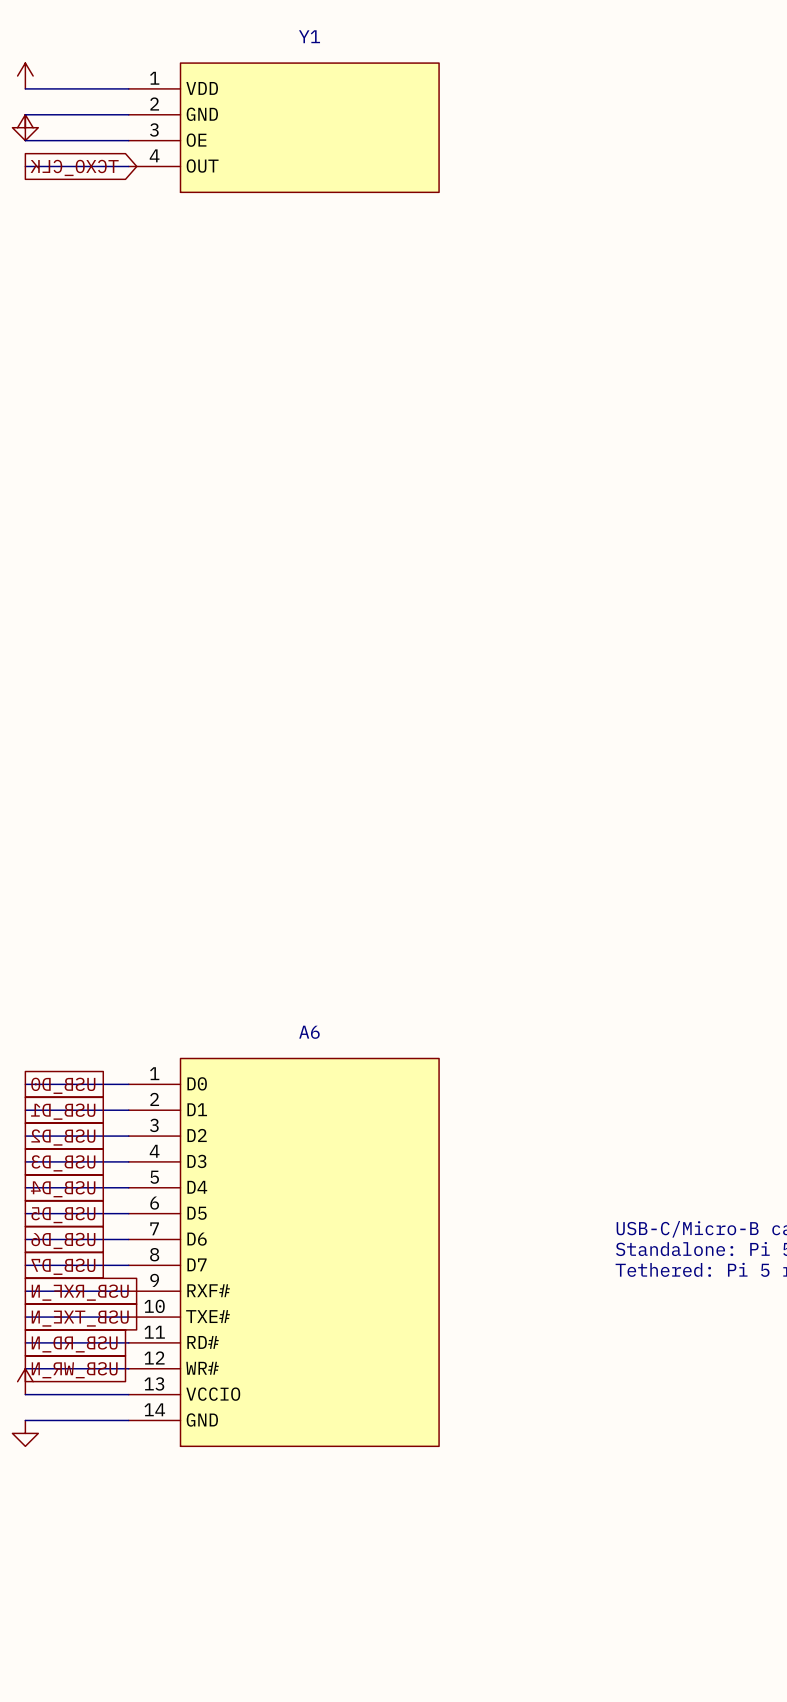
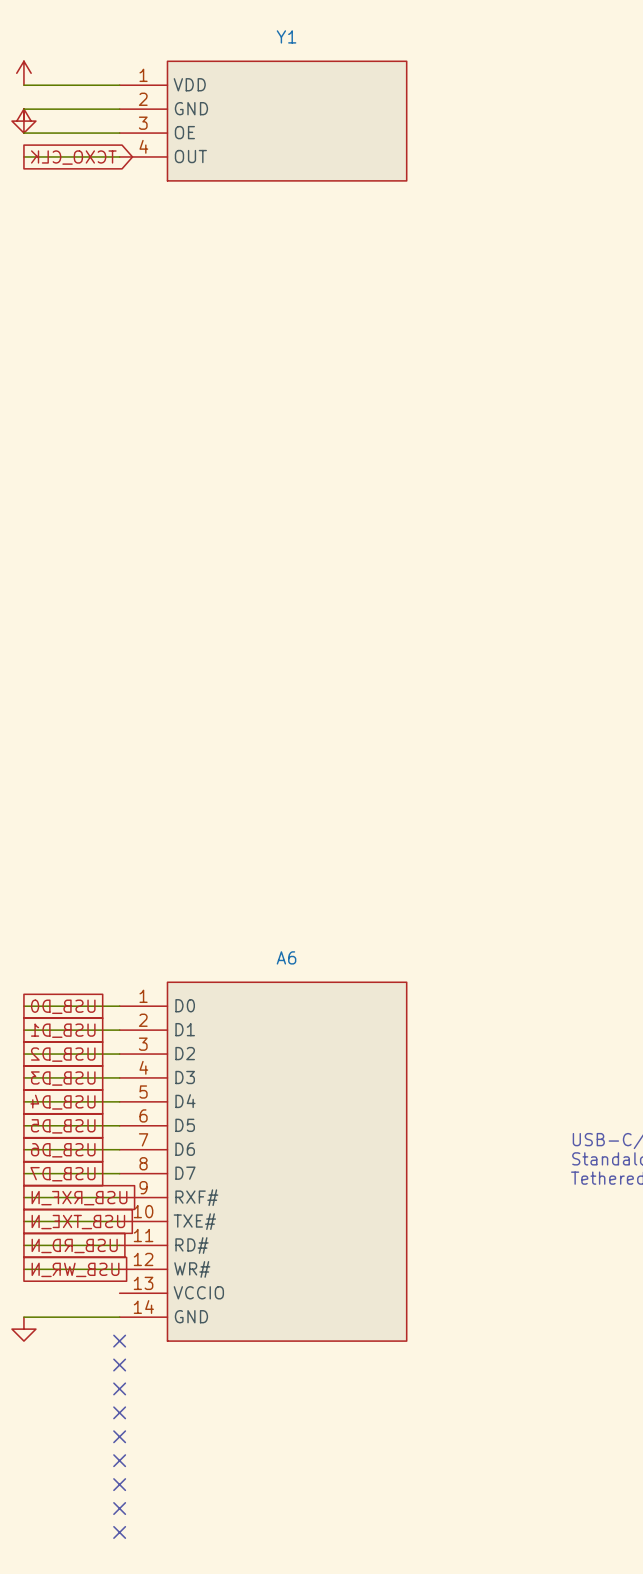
power symbol: (25, 1381) -> none
wire: (25, 1394) (128, 1394) -> none
no-connect mark: none -> (119, 1341)
no-connect mark: none -> (119, 1365)
no-connect mark: none -> (119, 1388)
no-connect mark: none -> (119, 1412)
no-connect mark: none -> (119, 1436)
no-connect mark: none -> (119, 1460)
no-connect mark: none -> (119, 1484)
no-connect mark: none -> (119, 1508)
no-connect mark: none -> (119, 1532)

